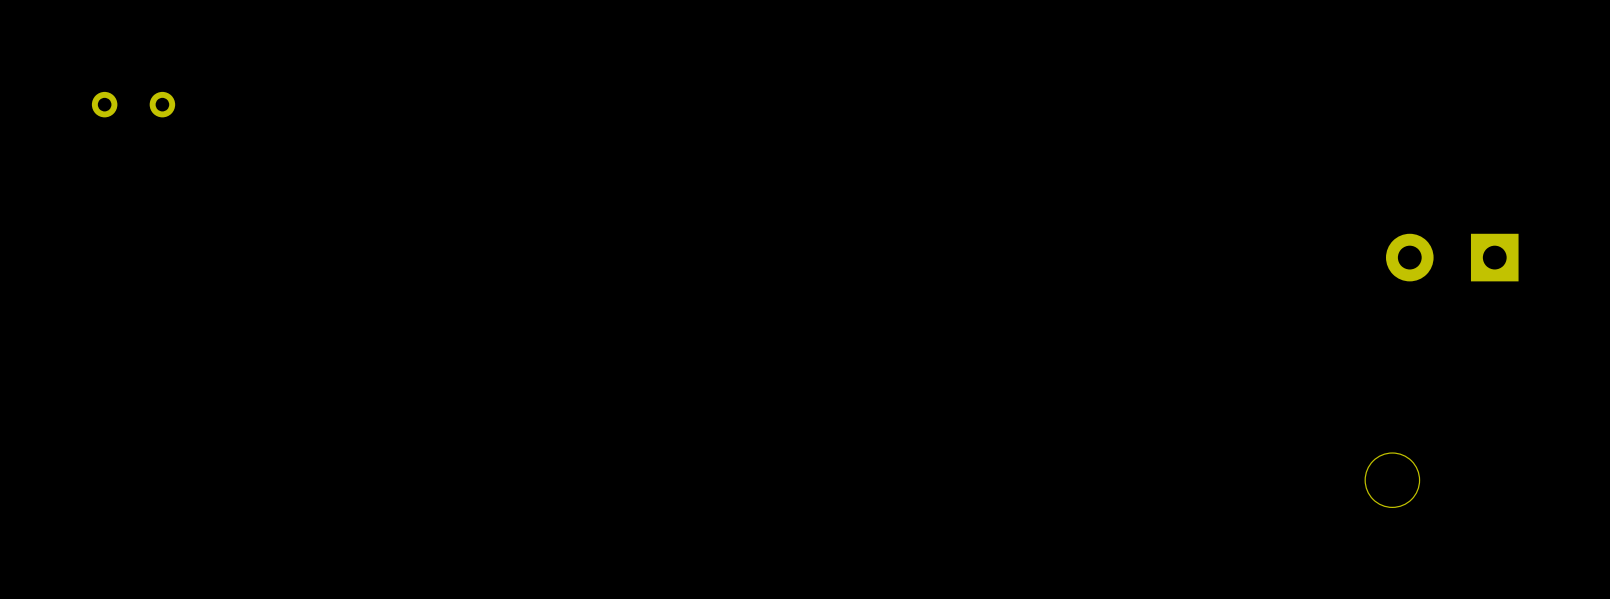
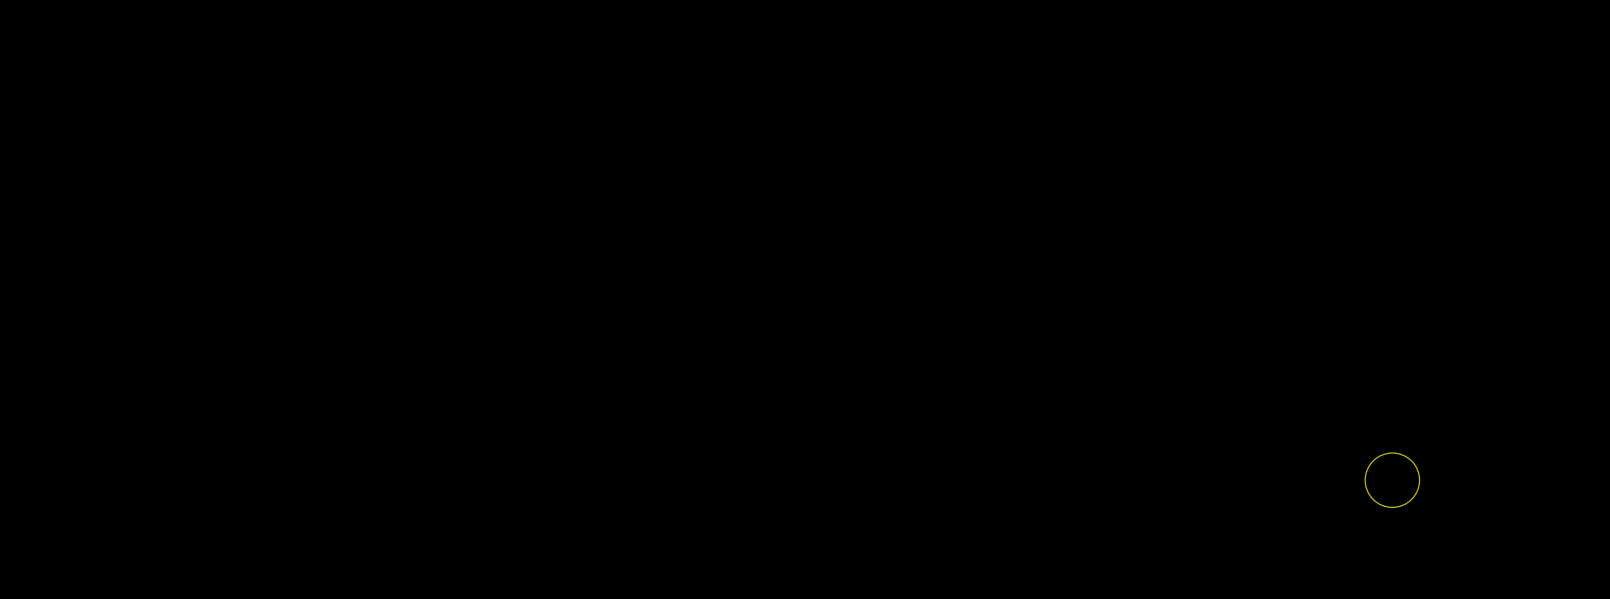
part: (133, 104) -> none
part: (1452, 257) -> none

